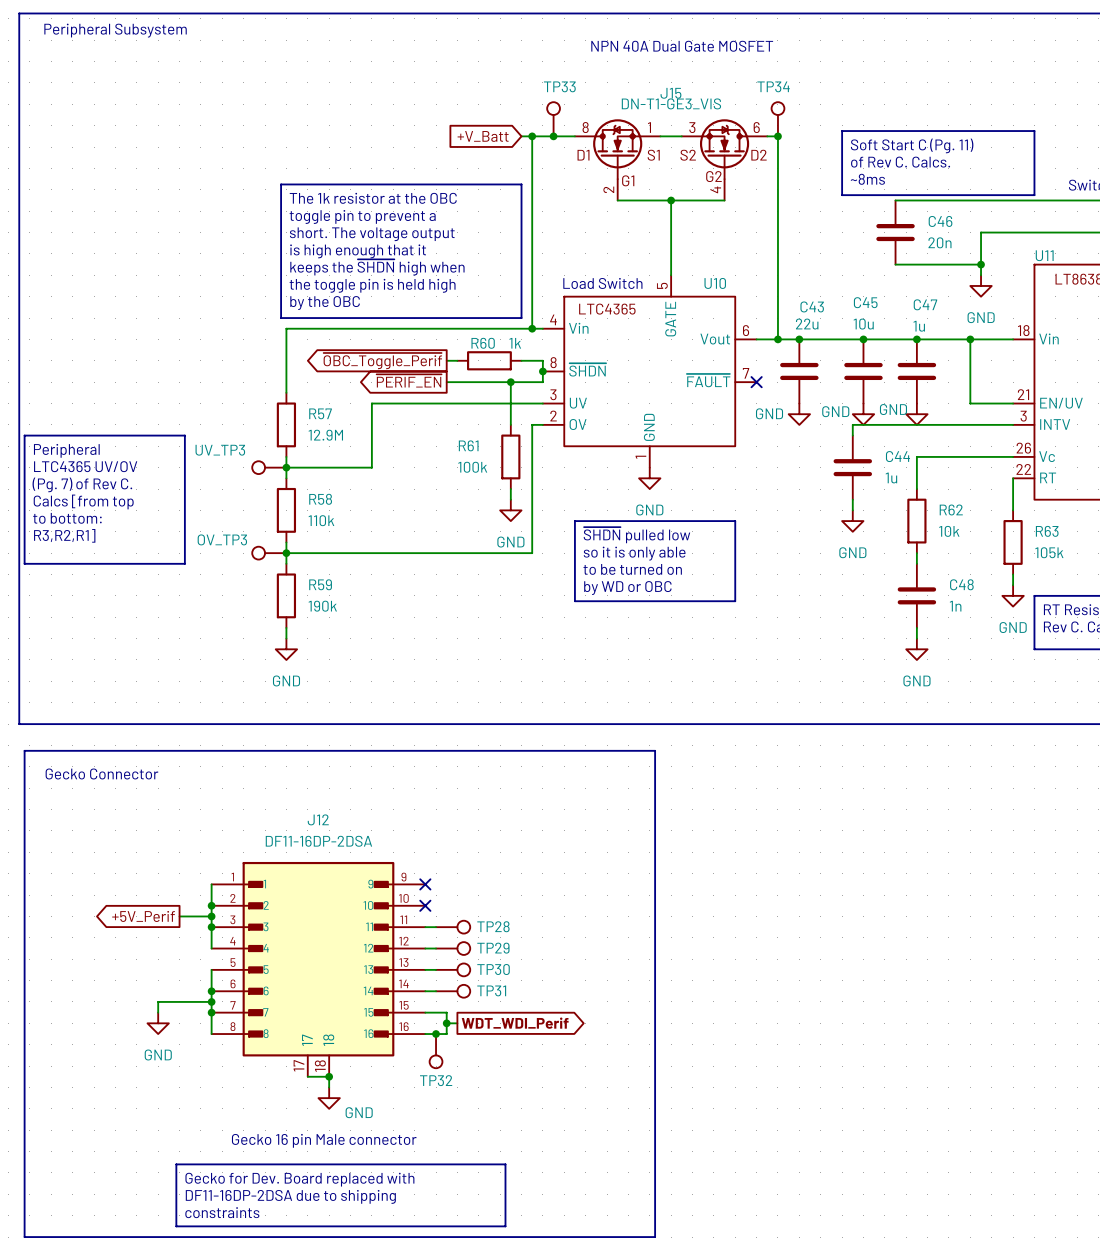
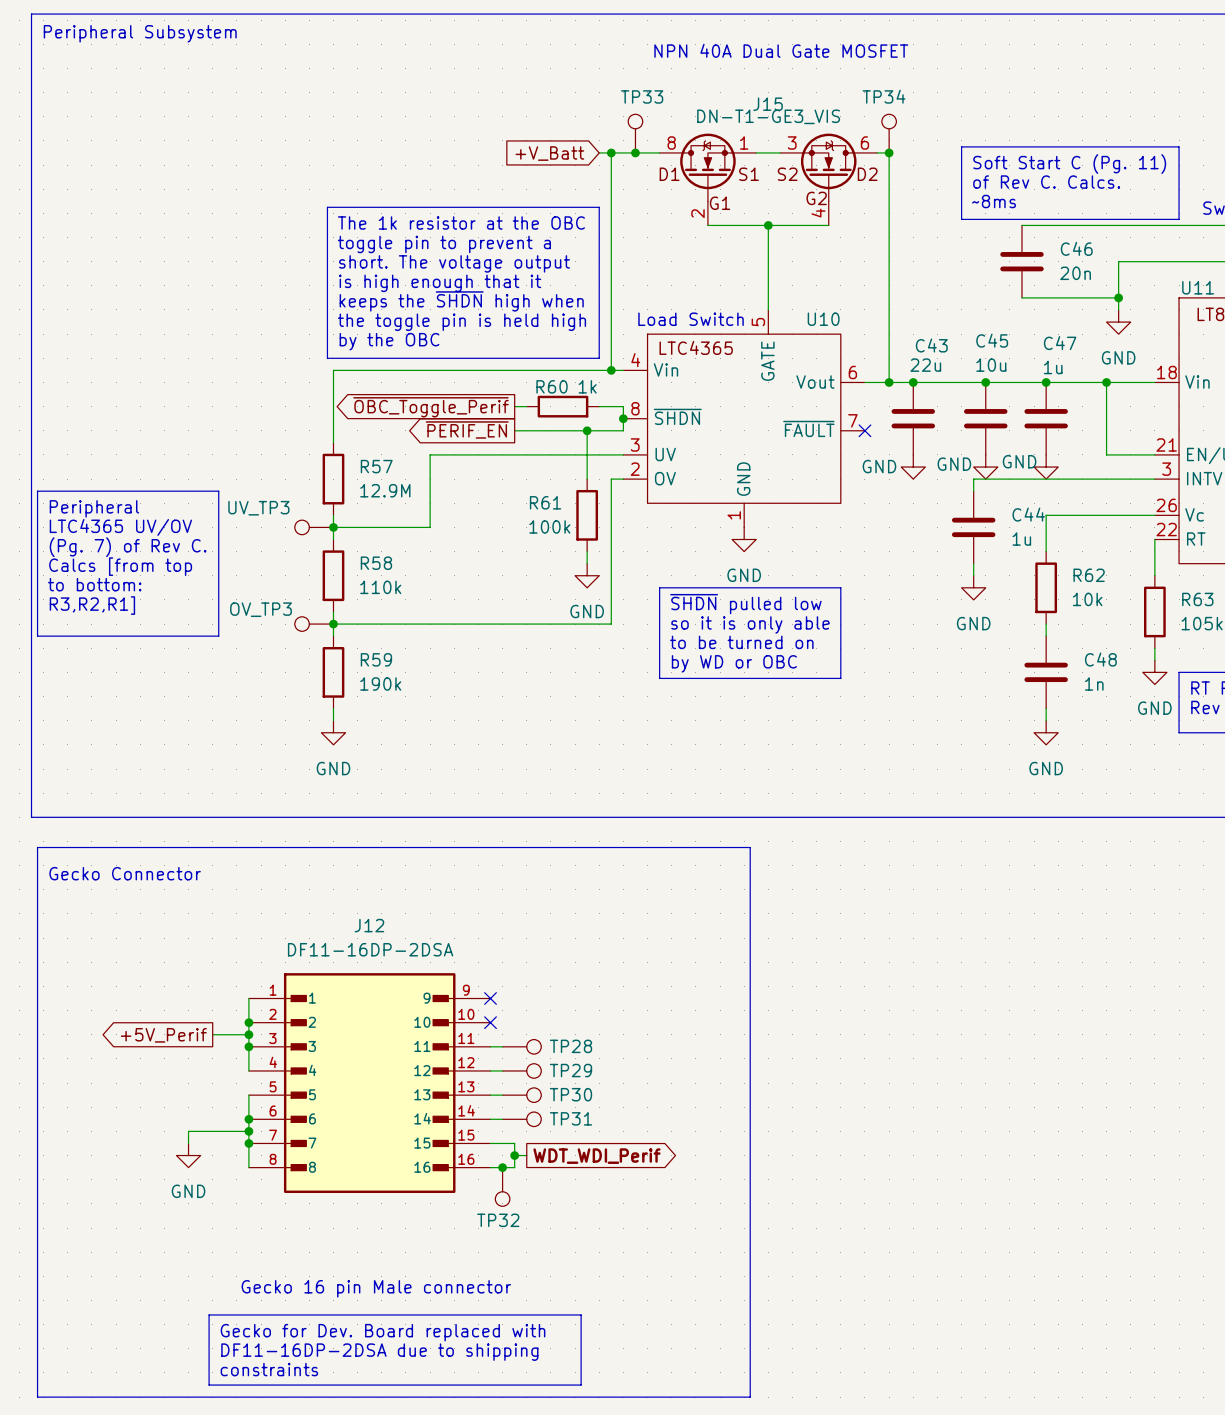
J12 symbol: [211, 861, 426, 1077] -> [248, 973, 491, 1193]
wire: (307, 1076) (329, 1076) (329, 1087) -> none
junction: (329, 1076) -> none
power symbol: GND (329, 1098) -> none

